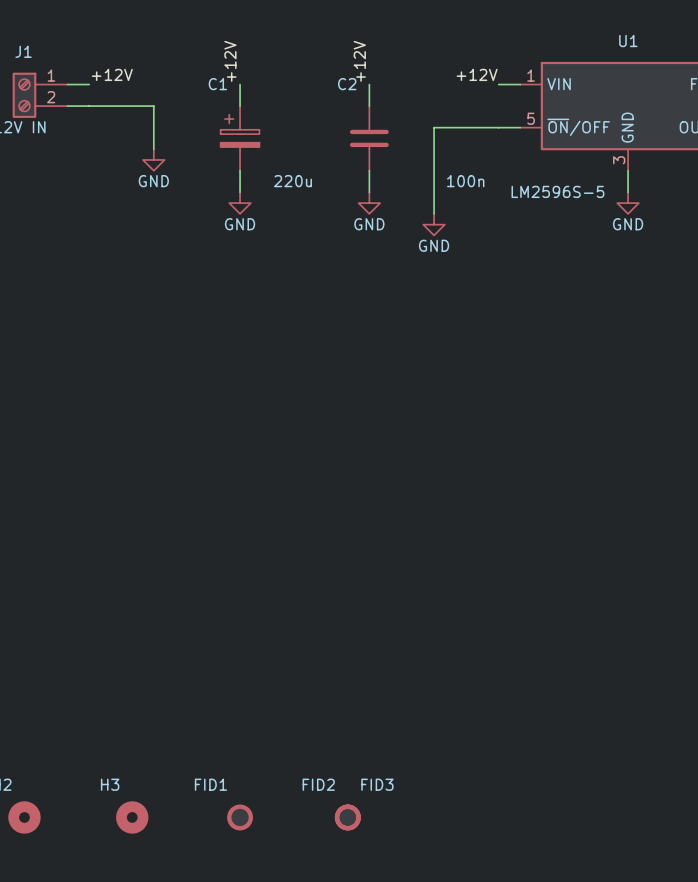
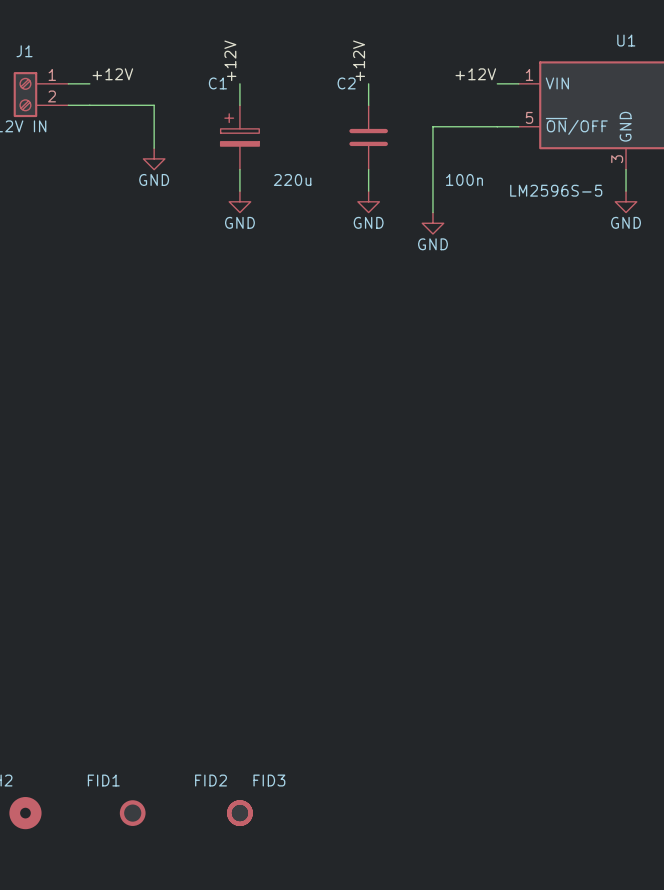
H3: (132, 817) -> none
FID1 position: (240, 817) -> (132, 813)
FID2 position: (347, 817) -> (239, 813)
FID3 position: (347, 817) -> (239, 813)

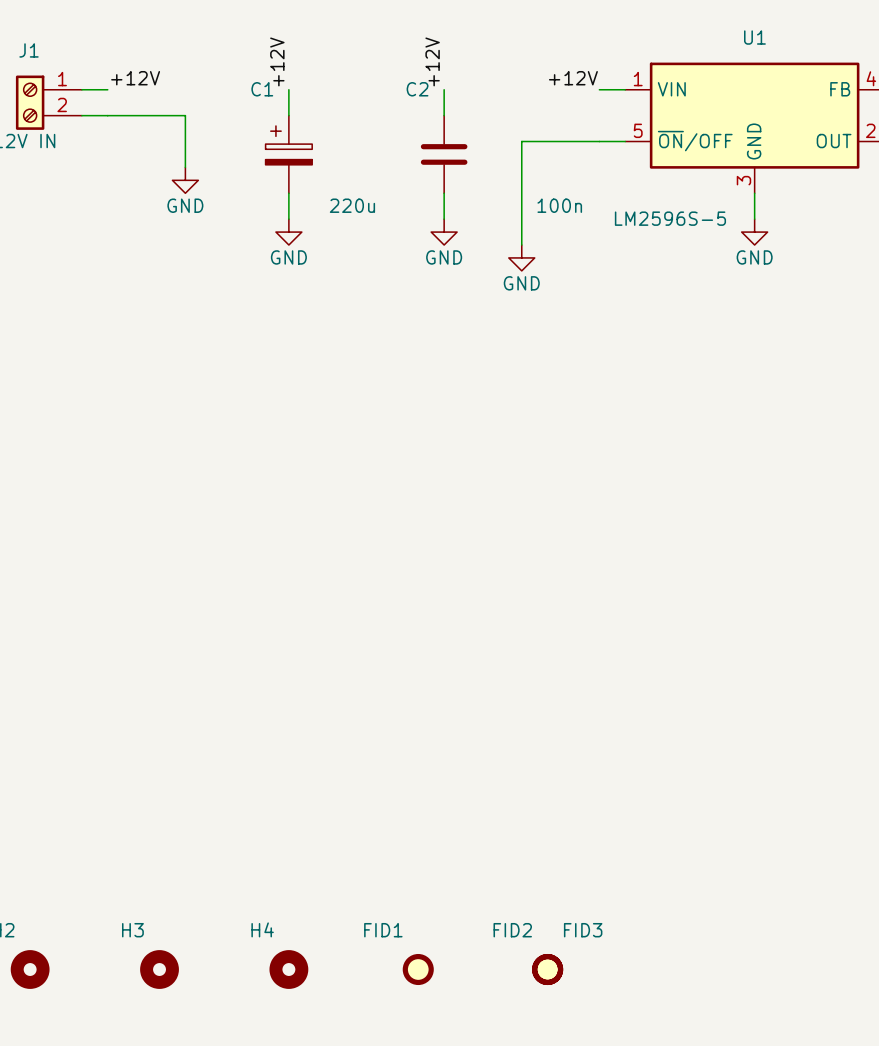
FID1 position: (132, 813) -> (418, 969)
H3: none -> (159, 969)
FID2 position: (239, 813) -> (547, 969)
FID3 position: (239, 813) -> (547, 969)
H4: none -> (288, 969)

